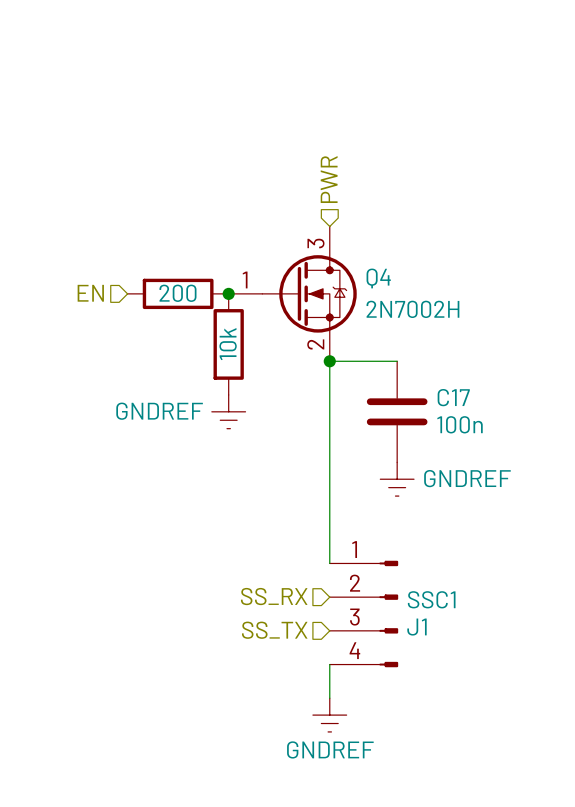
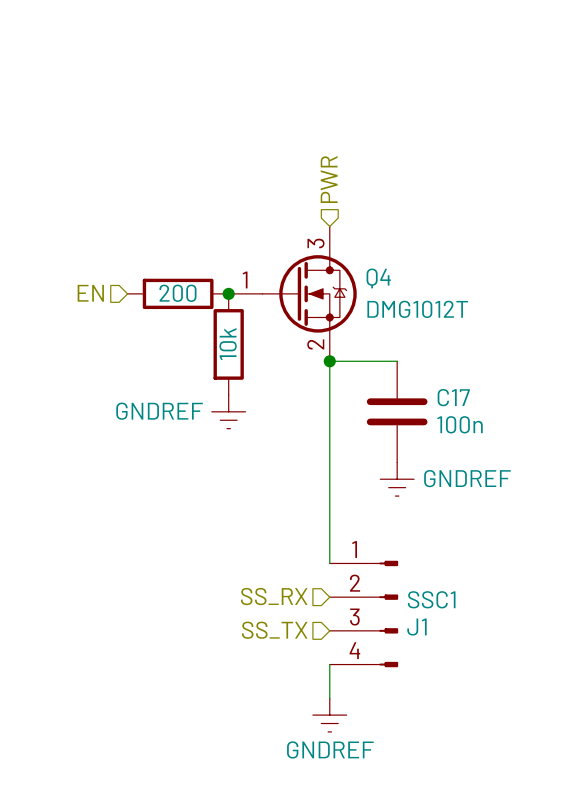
Q4 value: 2N7002H (412, 309) -> DMG1012T (417, 309)

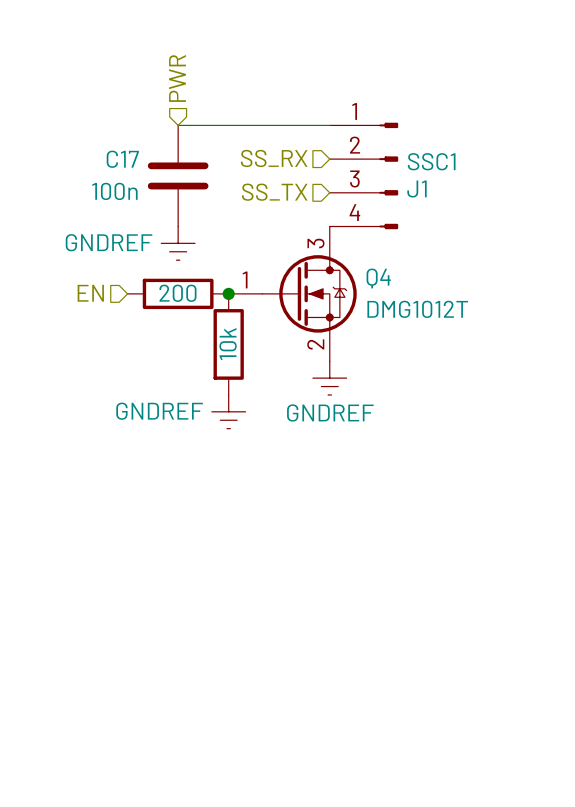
wire: none -> (178, 125) (329, 125)
hierarchical label: none -> SS_RX (274, 158)
hierarchical label position: PWR (329, 179) -> PWR (177, 78)
hierarchical label: none -> SS_TX (274, 192)
power symbol: none -> GNDREF (178, 243)
junction: (329, 361) -> none
wire: (397, 361) (329, 361) (329, 563) -> none
C17 name position: C17 (453, 397) -> C17 (122, 159)
C17 position: (397, 411) -> (178, 175)
C17 value position: 100n (460, 424) -> 100n (114, 191)
power symbol text position: GNDREF (467, 478) -> GNDREF (330, 412)
power symbol position: GNDREF (397, 479) -> GNDREF (329, 378)
hierarchical label: SS_RX (274, 596) -> none
J1 position: (363, 614) -> (363, 175)
hierarchical label: SS_TX (274, 630) -> none
wire: (329, 664) (329, 698) -> none
power symbol: GNDREF (329, 715) -> none

